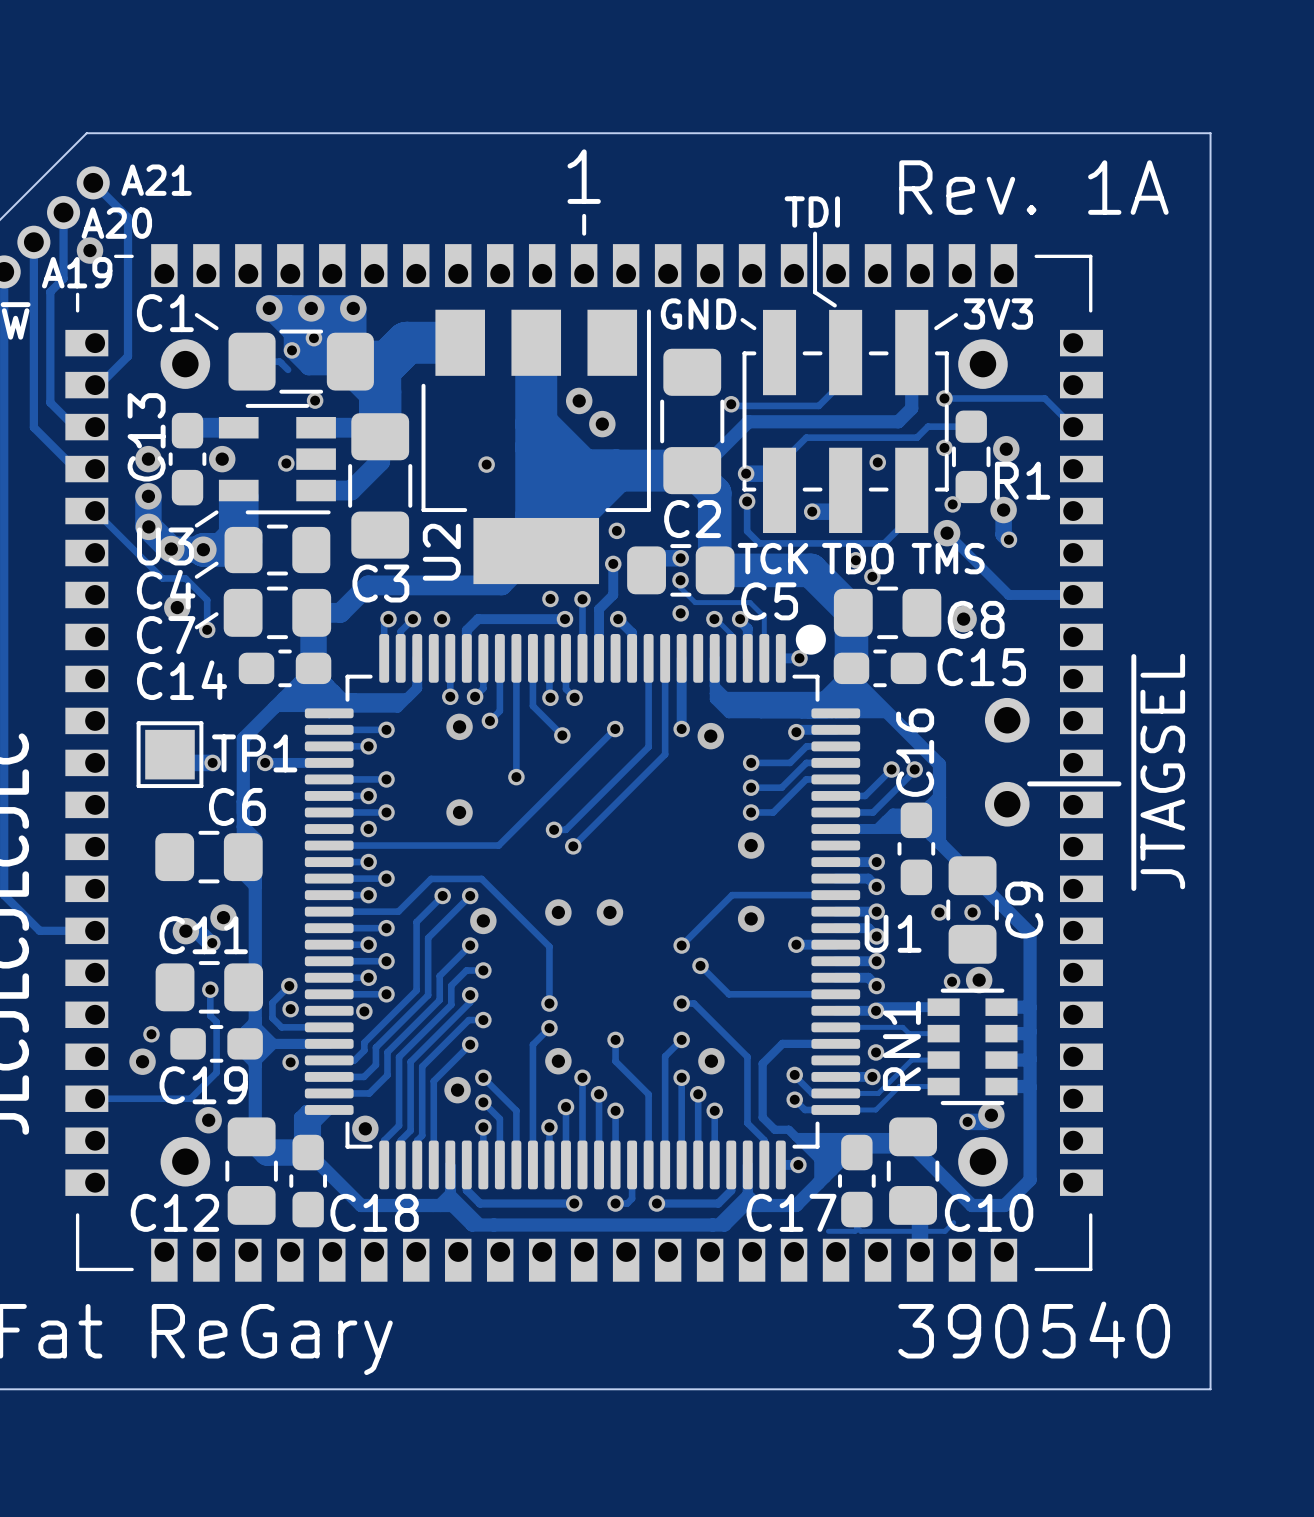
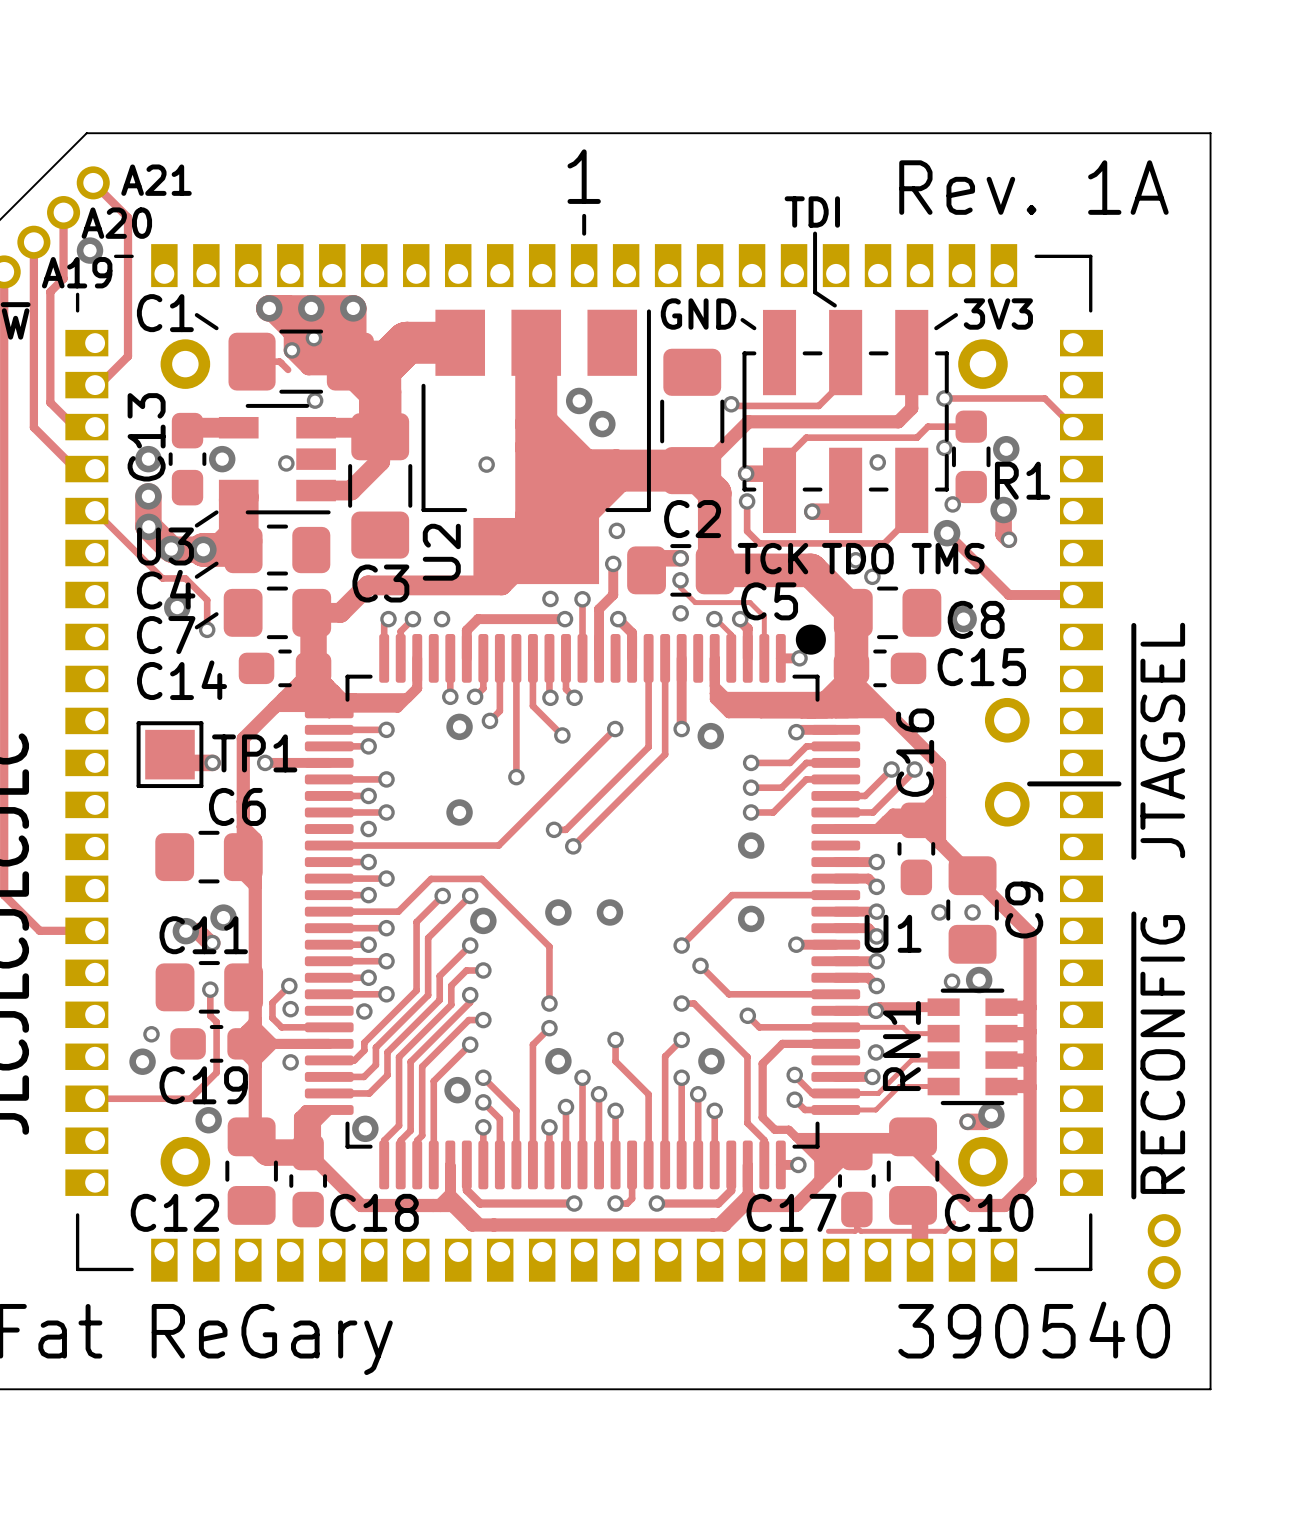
text position: ~{JTAGSEL} (1158, 772) -> ~{JTAGSEL} (1158, 741)
track: none -> (747, 1015) (759, 1027) (835, 1027)
via: none -> (747, 1015)
text: none -> ~{RECONFIG} (1158, 1055)
part: none -> (1164, 1251)

